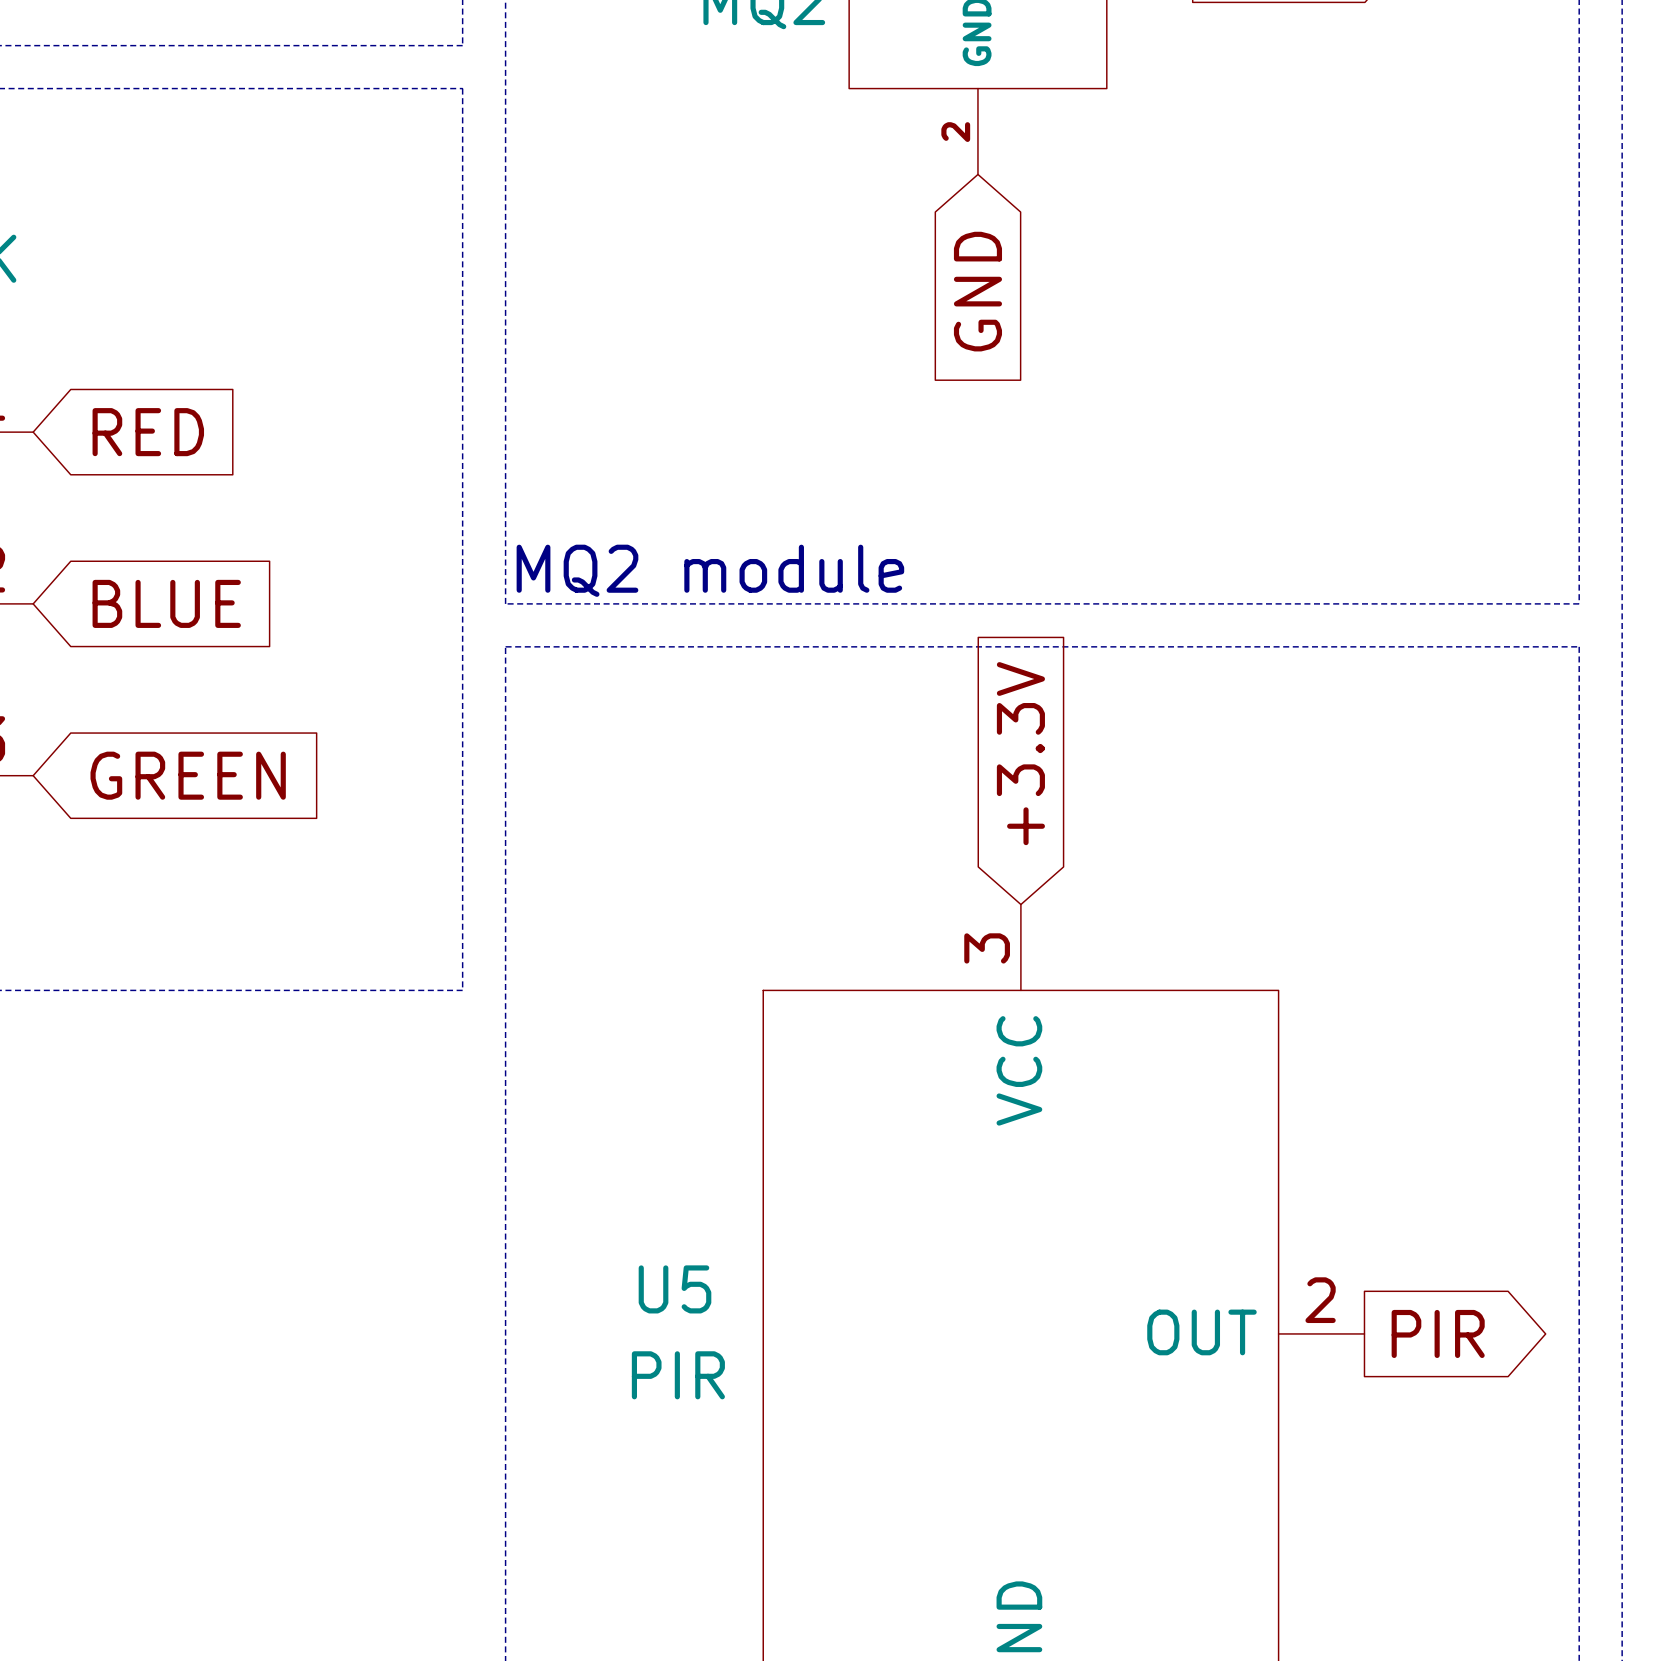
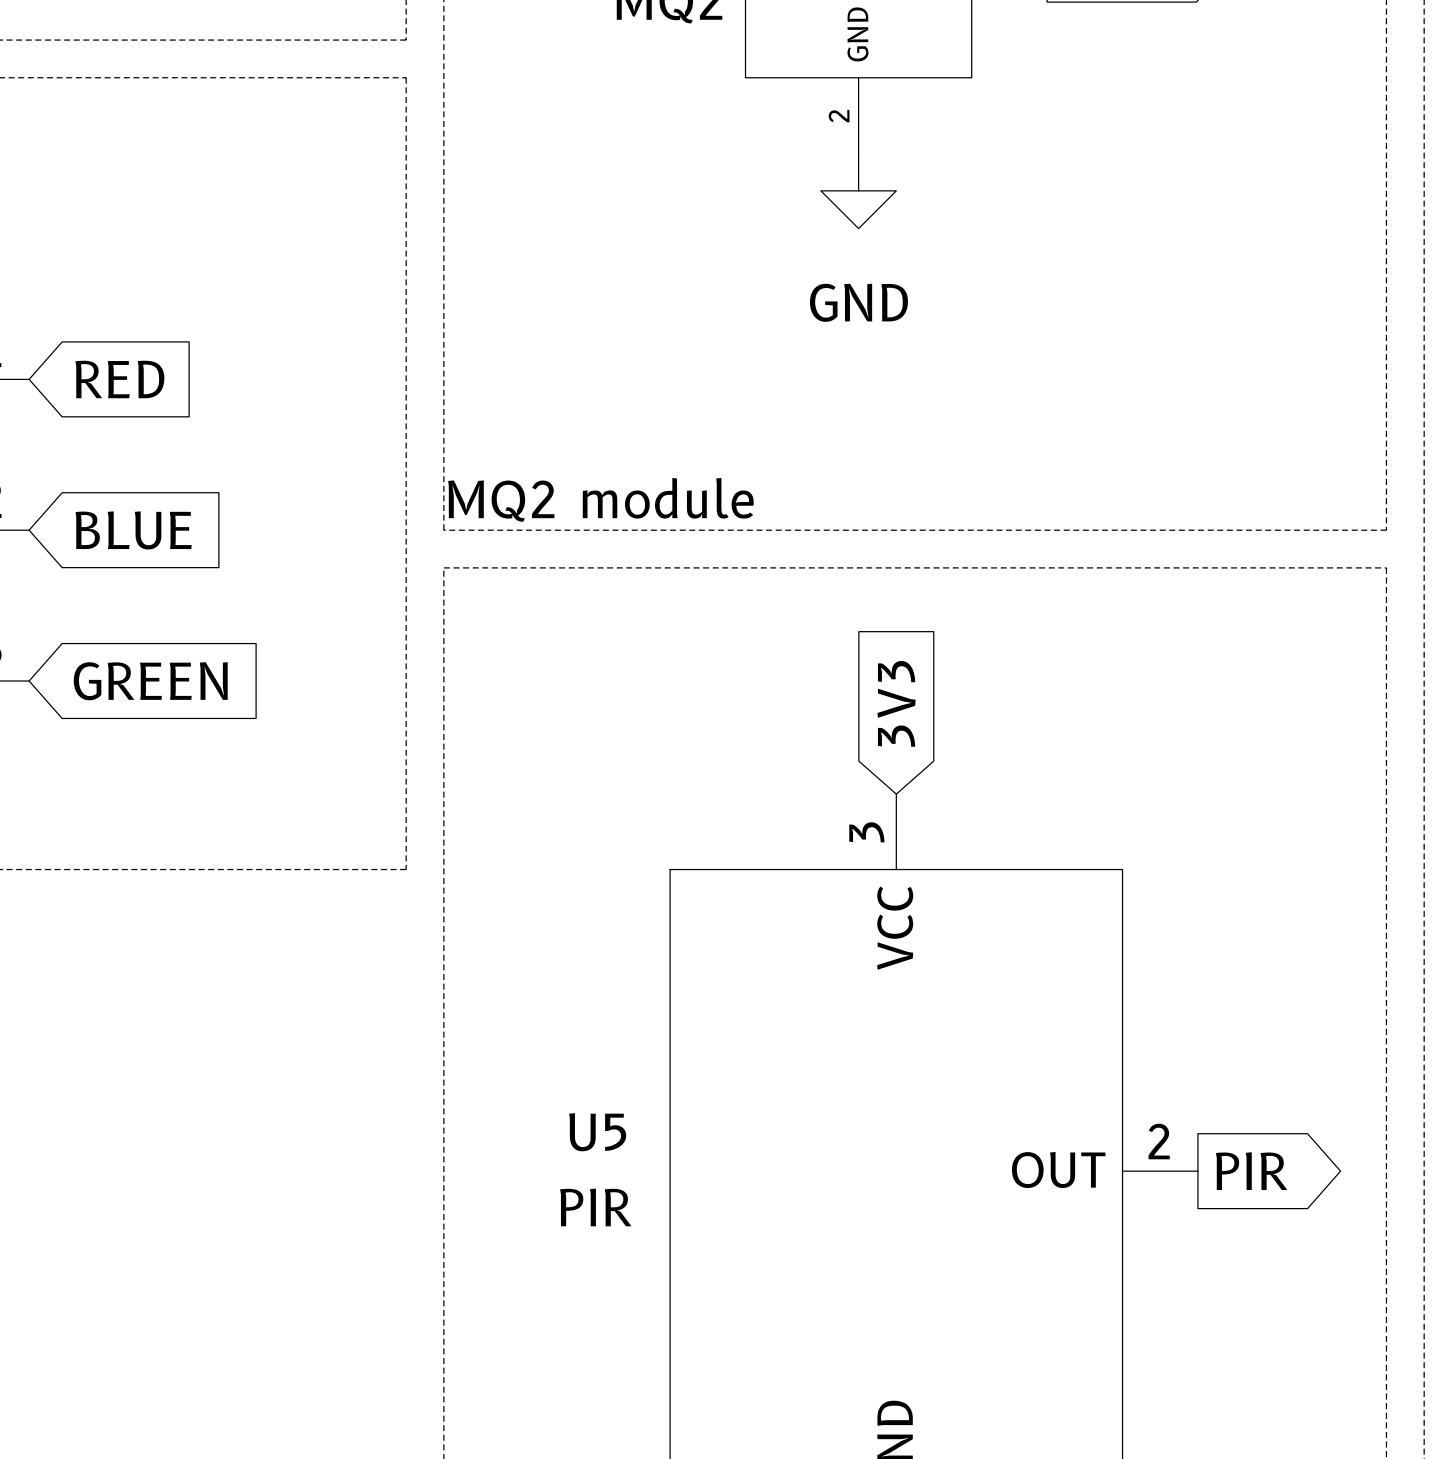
power symbol: none -> GND (858, 190)
global label: GND (977, 291) -> none
global label: +3.3V (1020, 753) -> 3V3 (896, 703)

